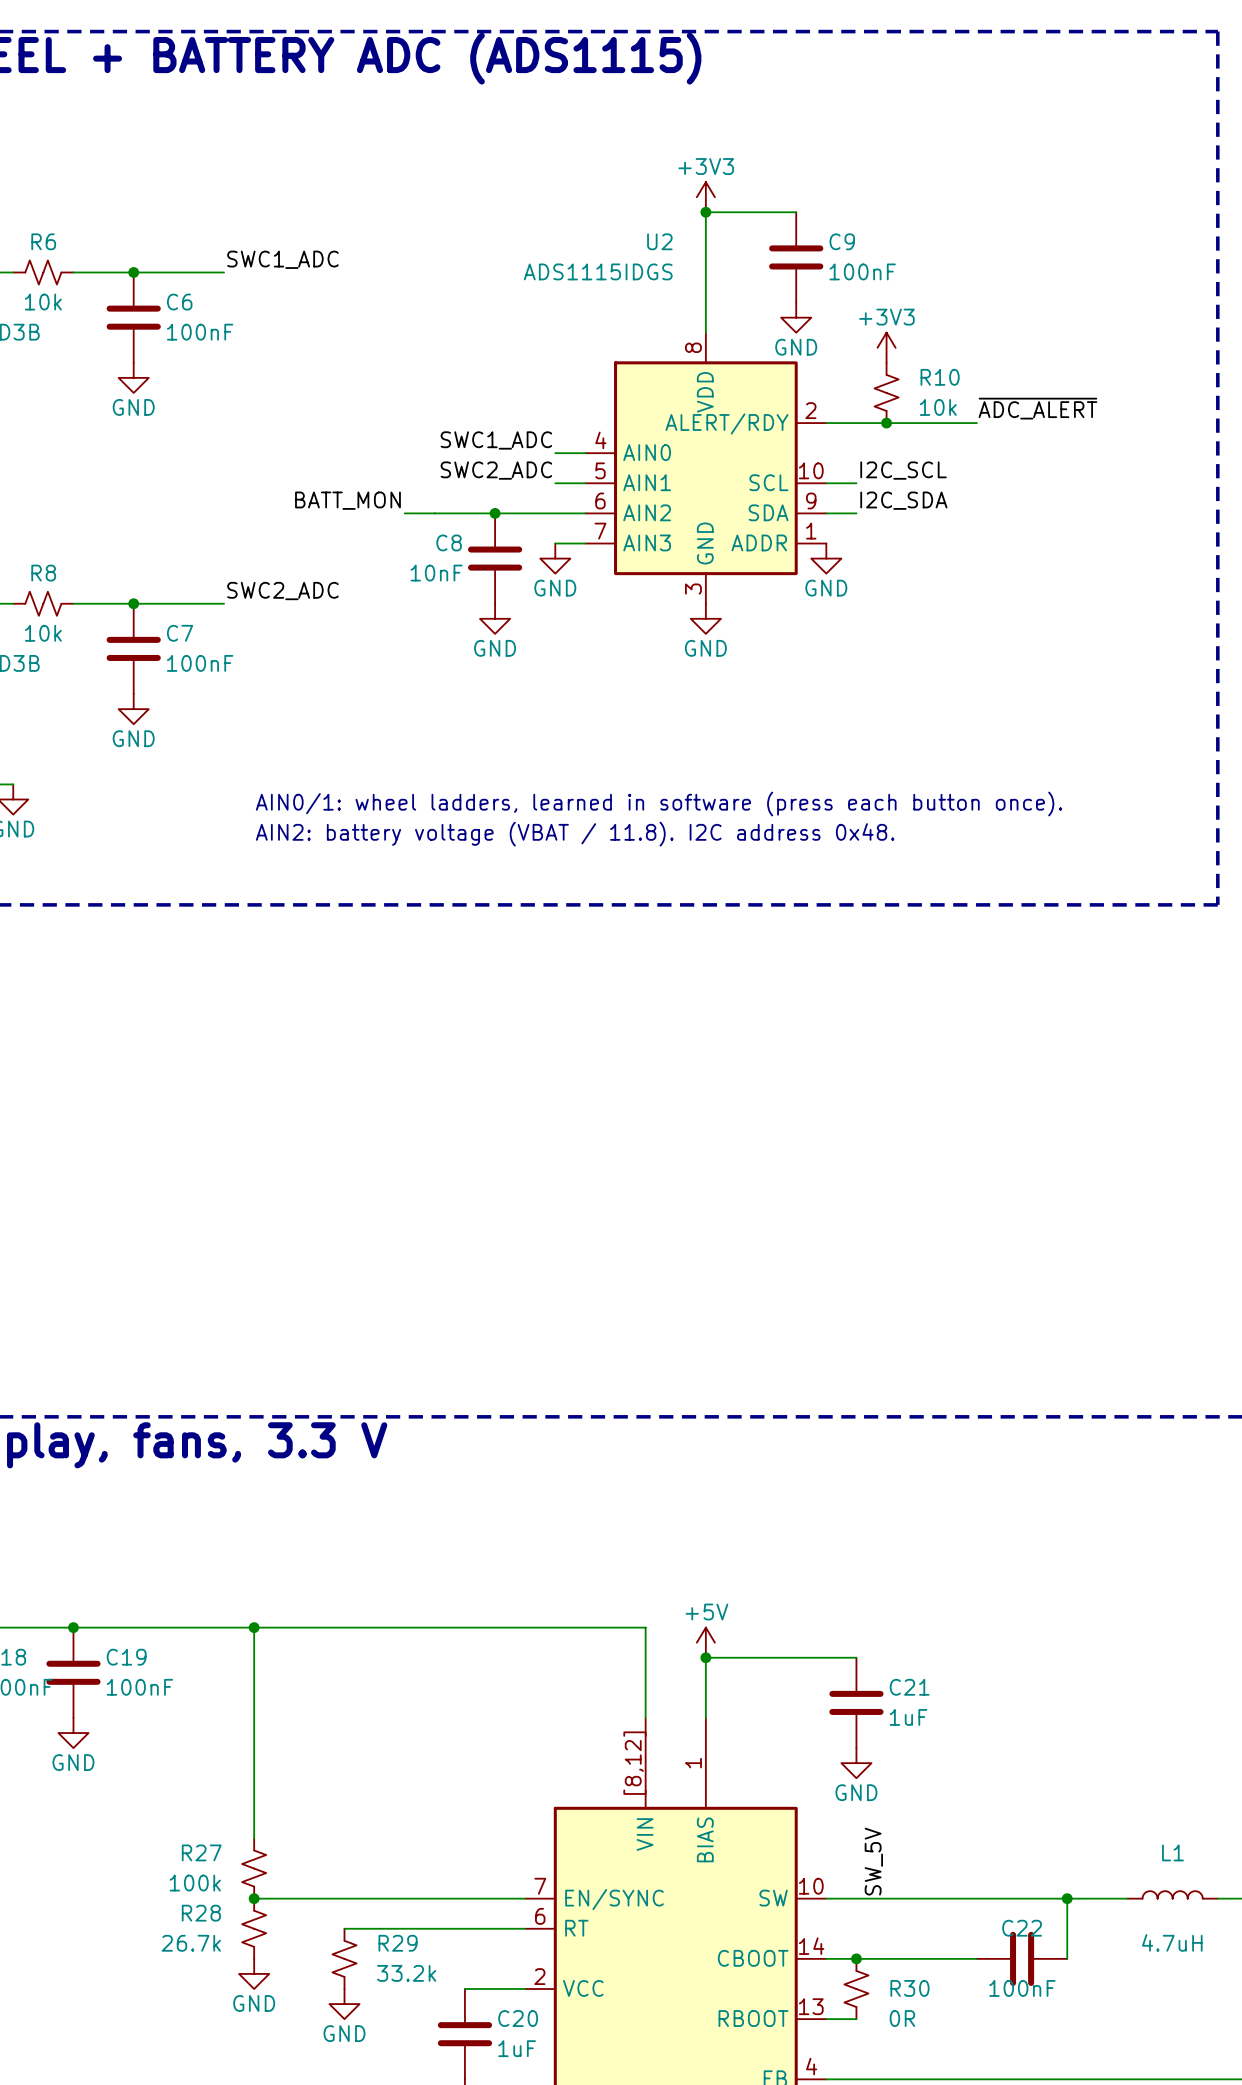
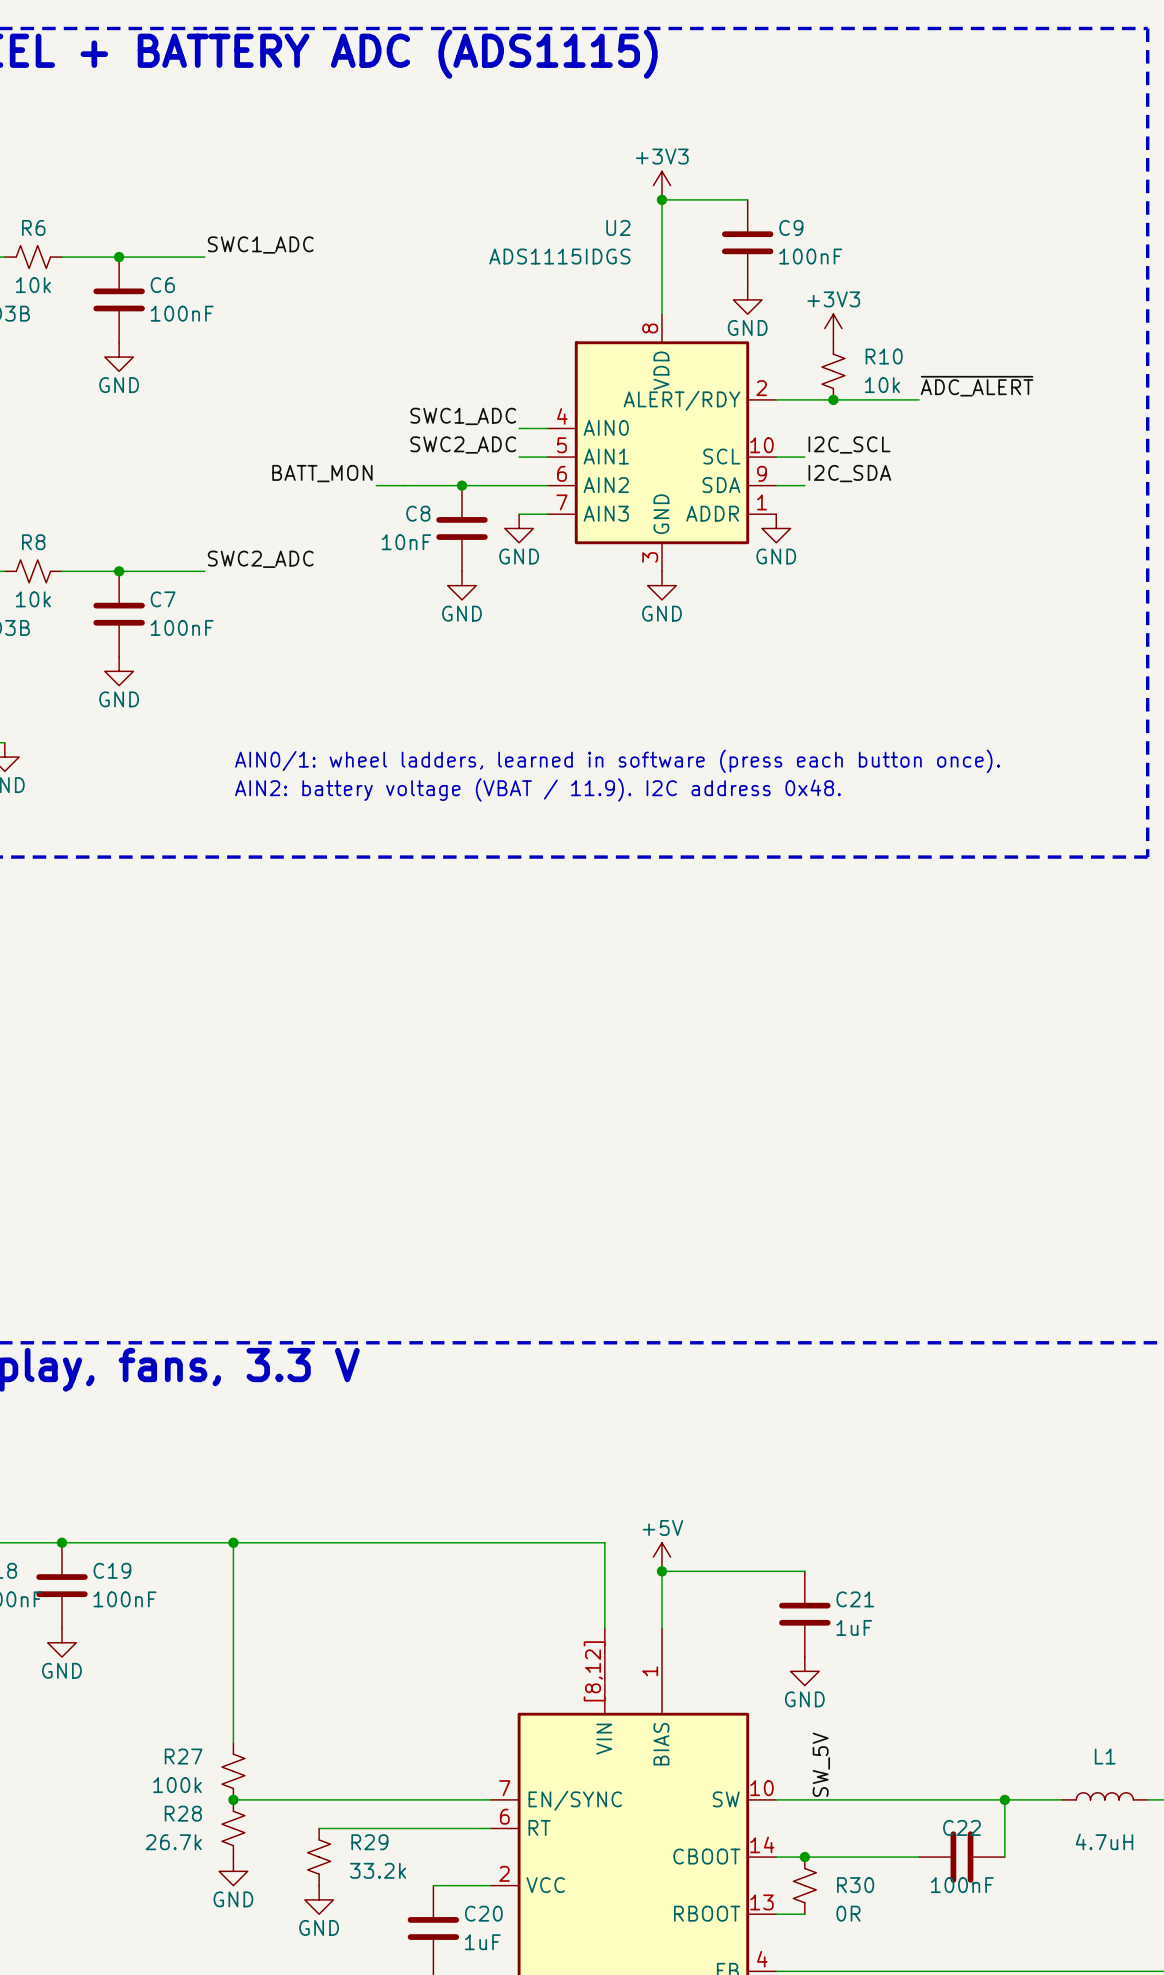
text: AIN2: battery voltage (VBAT / 11.8). I2C address 0x48. (575, 834) -> AIN2: battery voltage (VBAT / 11.9). I2C address 0x48. (537, 789)

